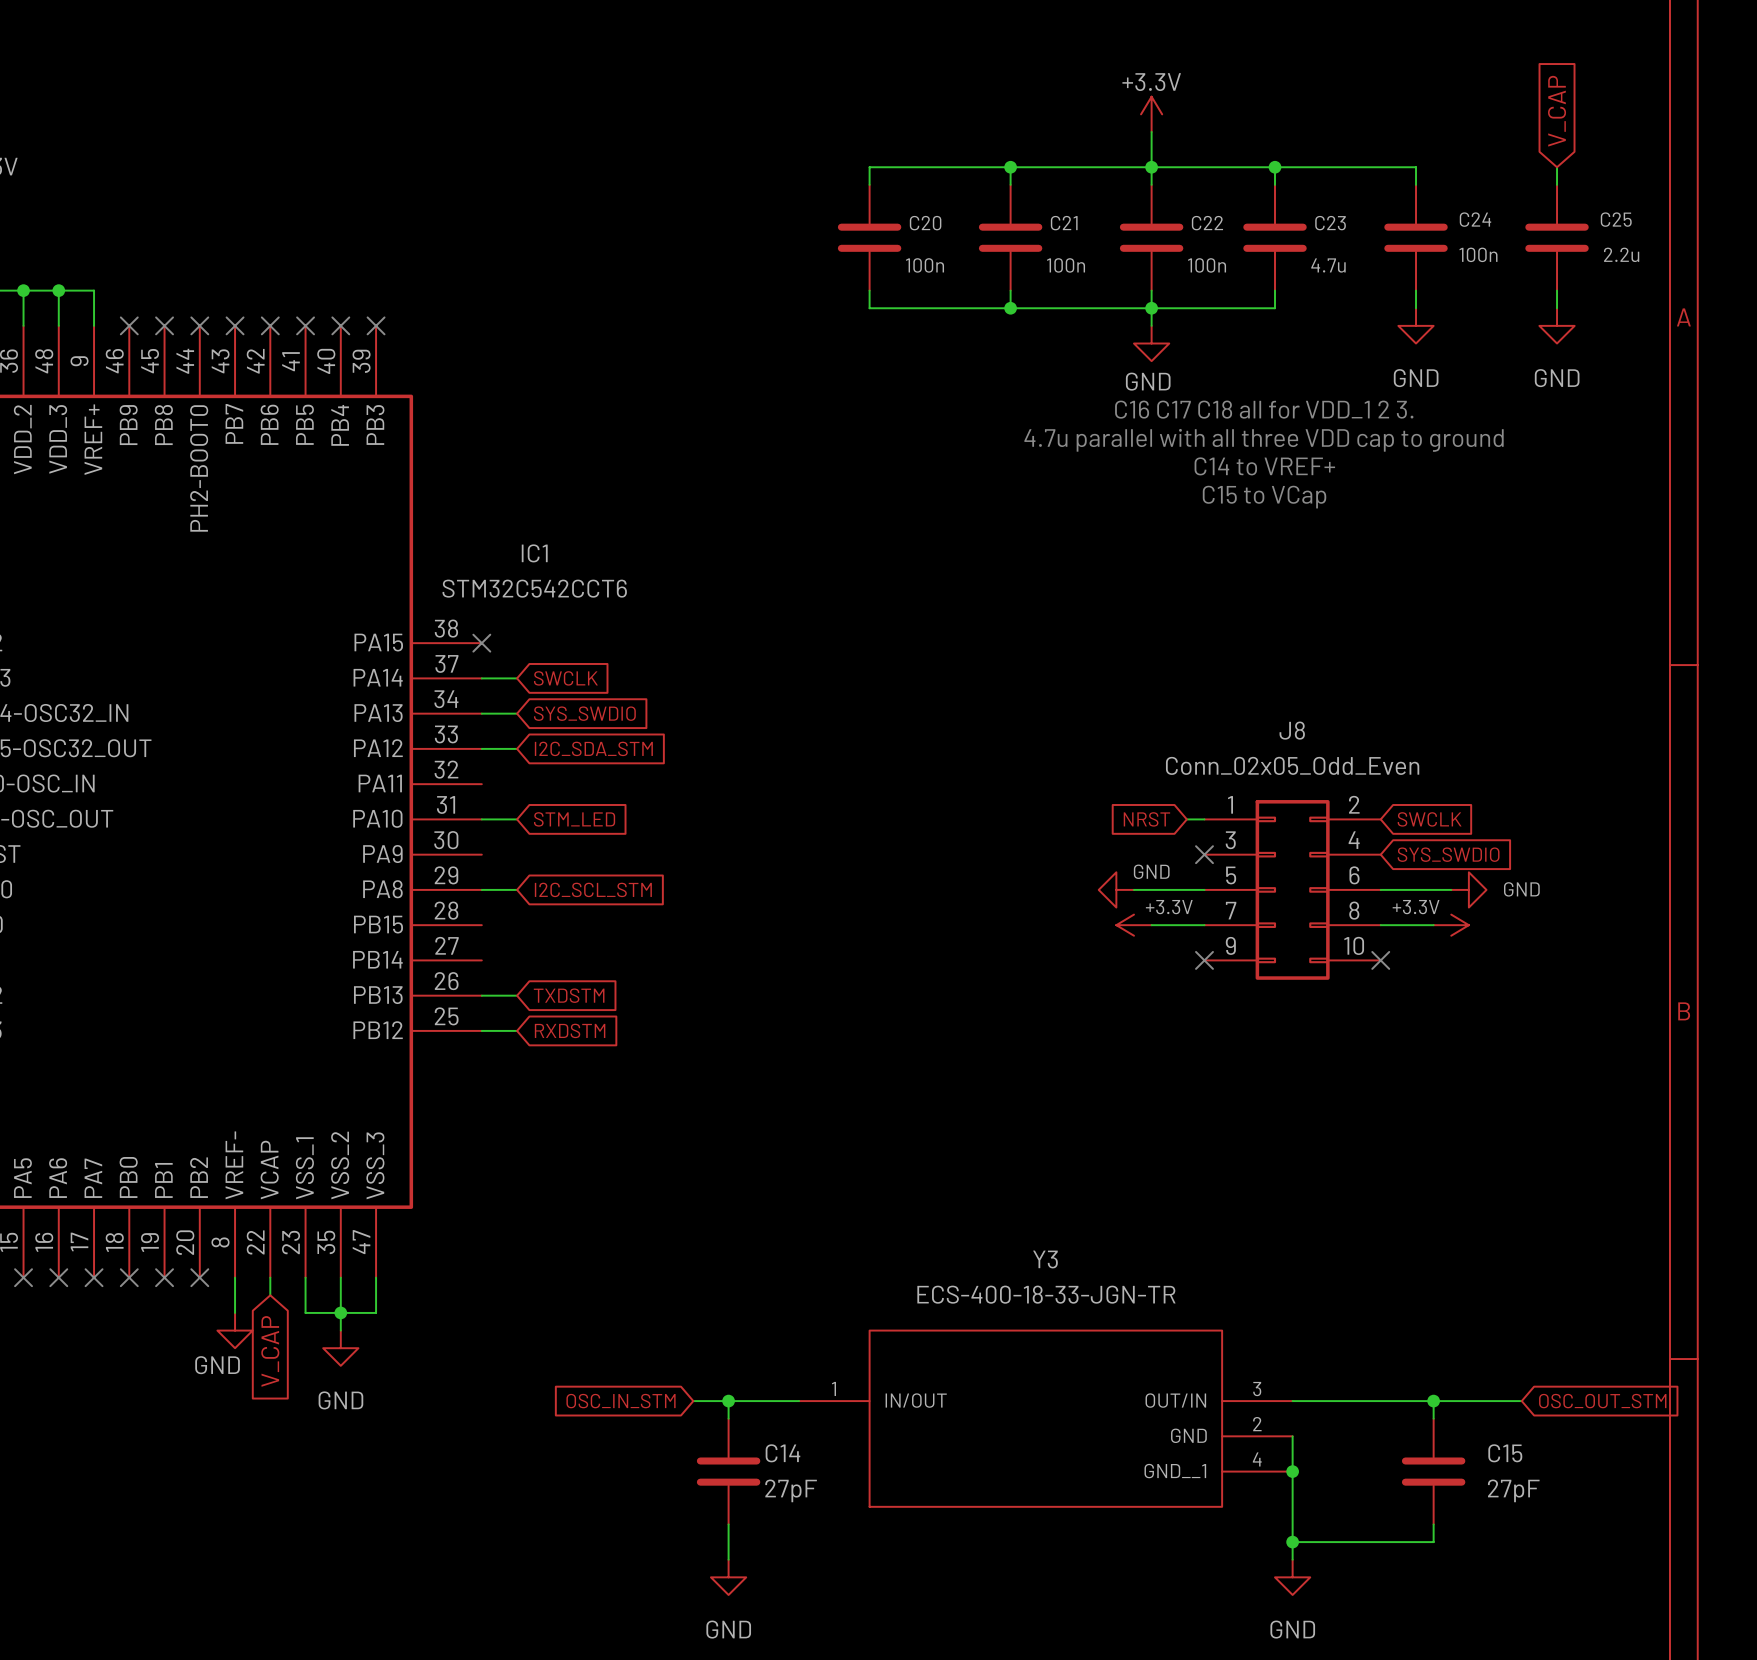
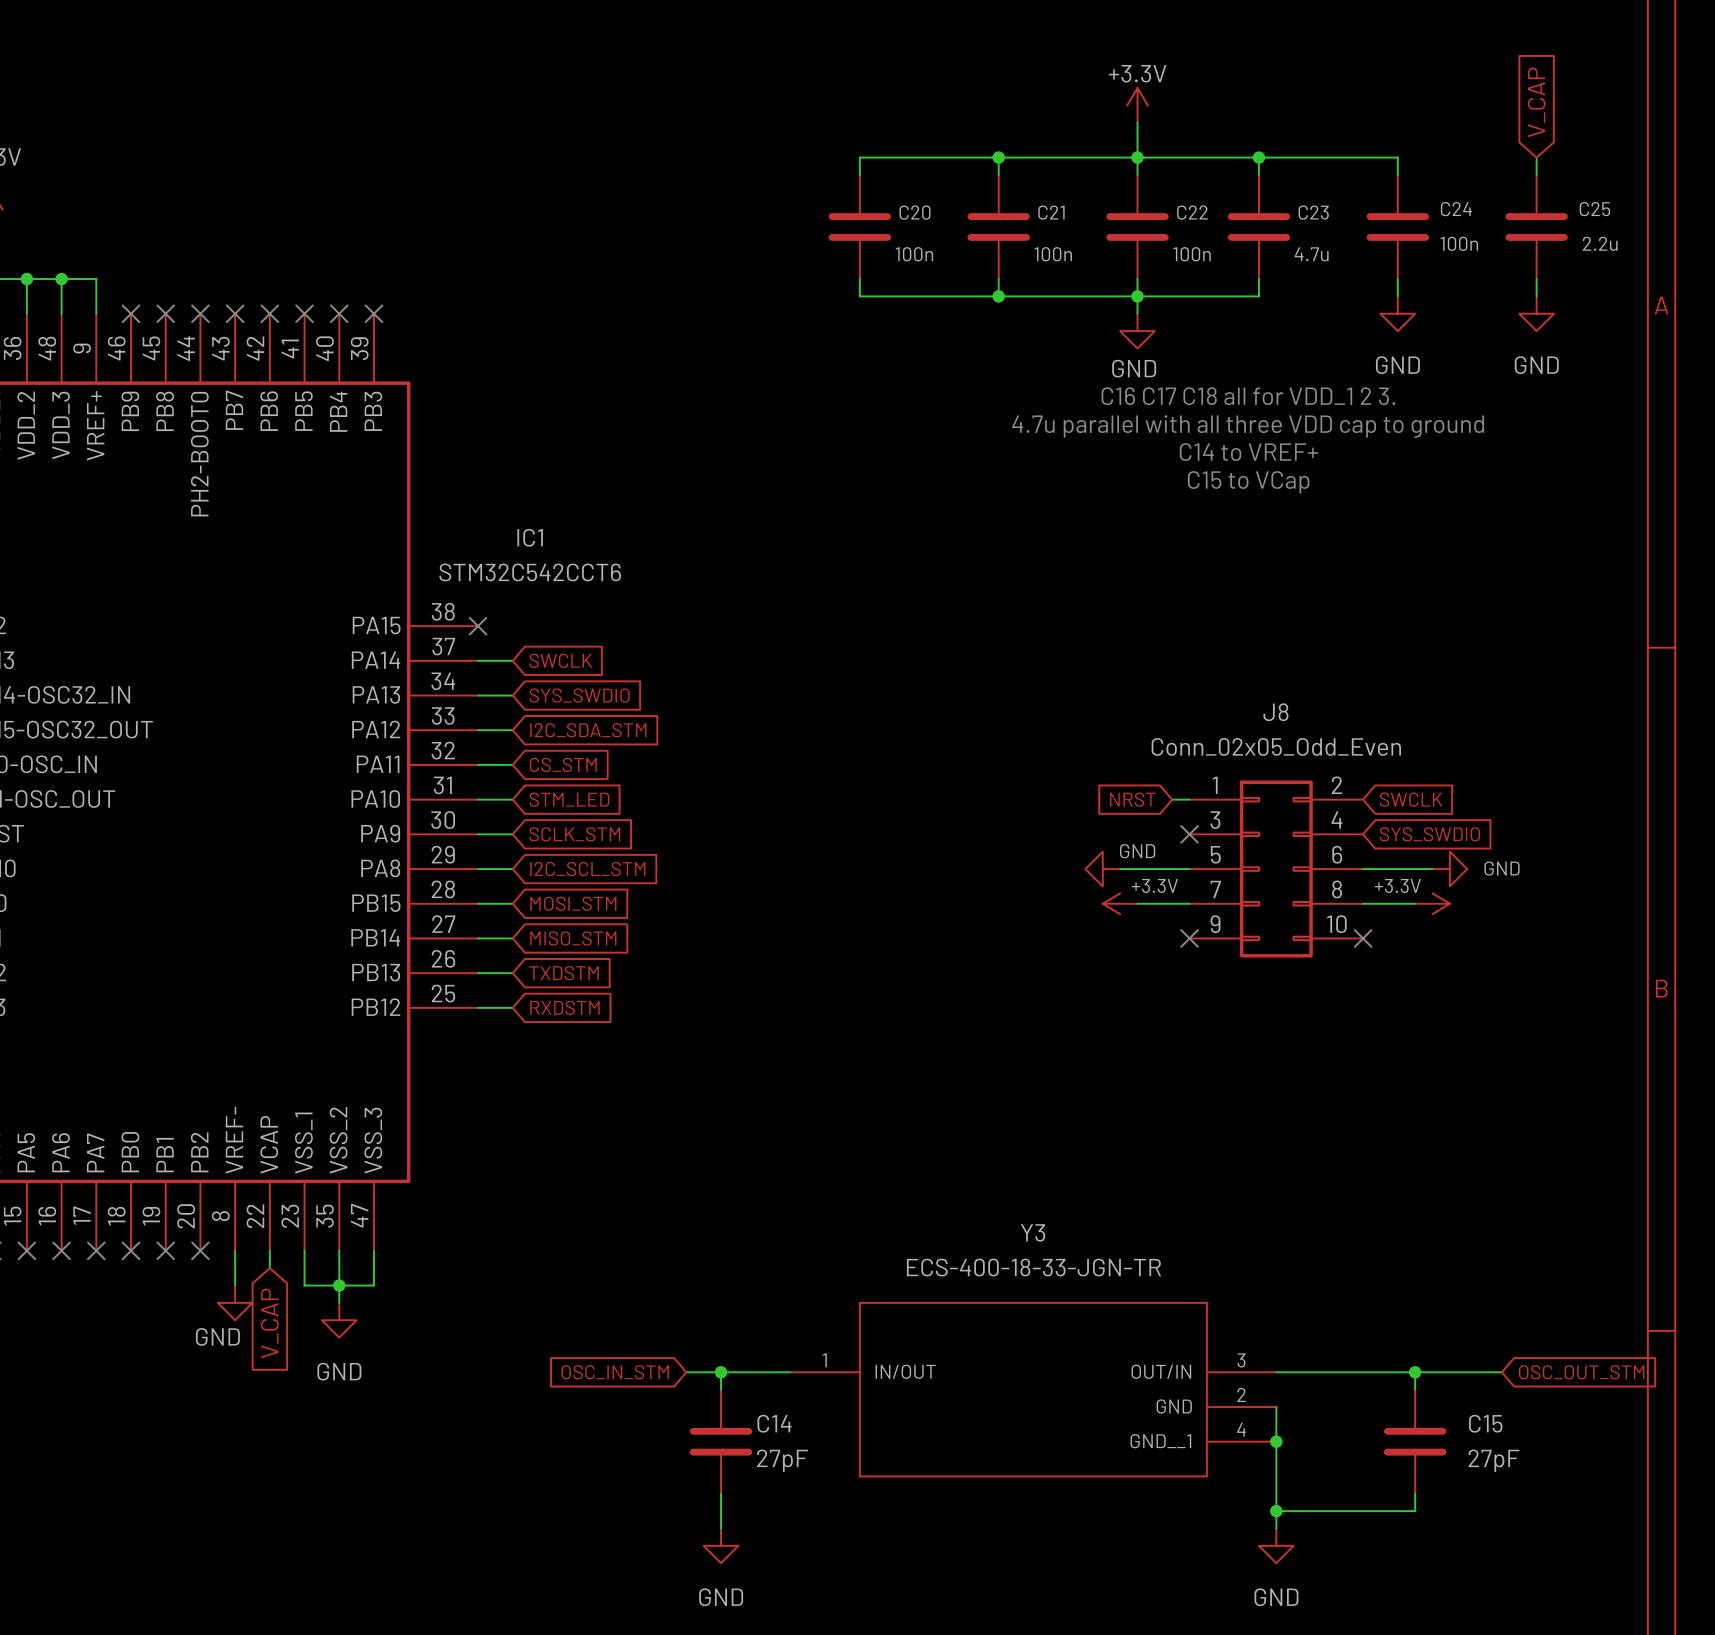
wire: none -> (478, 764) (512, 764)
global label: none -> CS_STM (563, 764)
wire: none -> (478, 834) (512, 834)
global label: none -> SCLK_STM (574, 834)
wire: none -> (478, 903) (512, 903)
global label: none -> MOSI_STM (573, 903)
wire: none -> (478, 938) (512, 938)
global label: none -> MISO_STM (573, 938)

